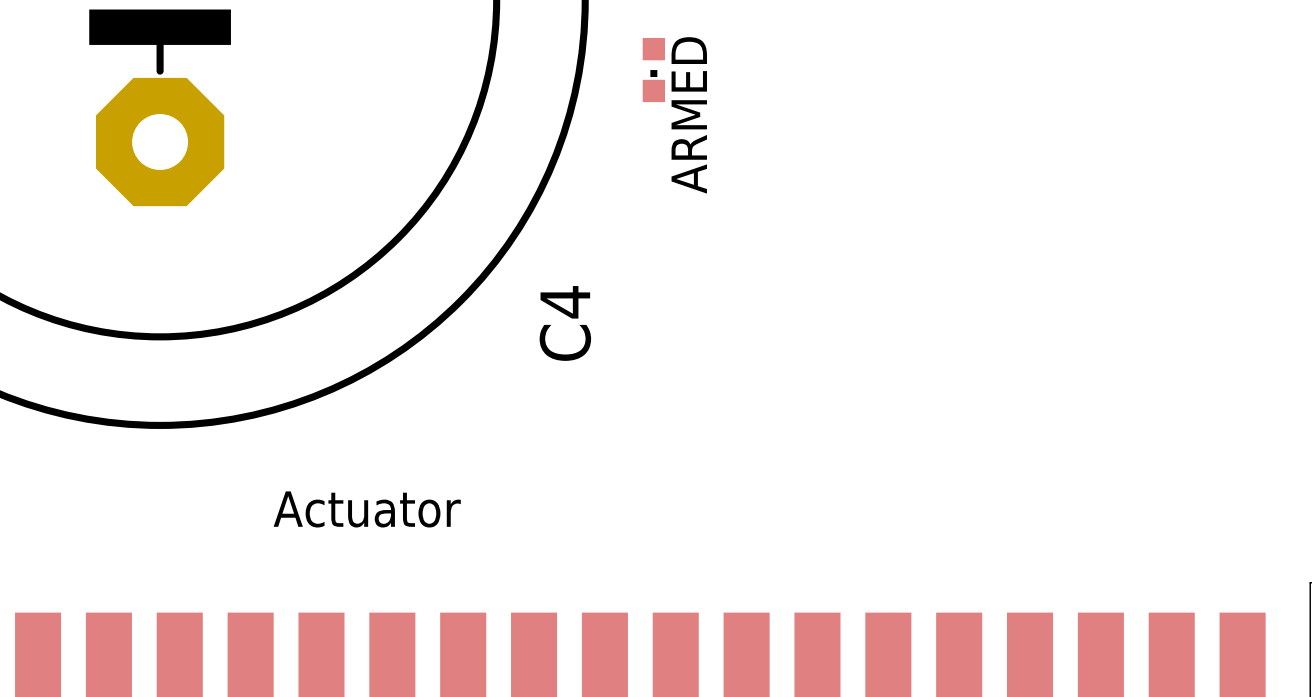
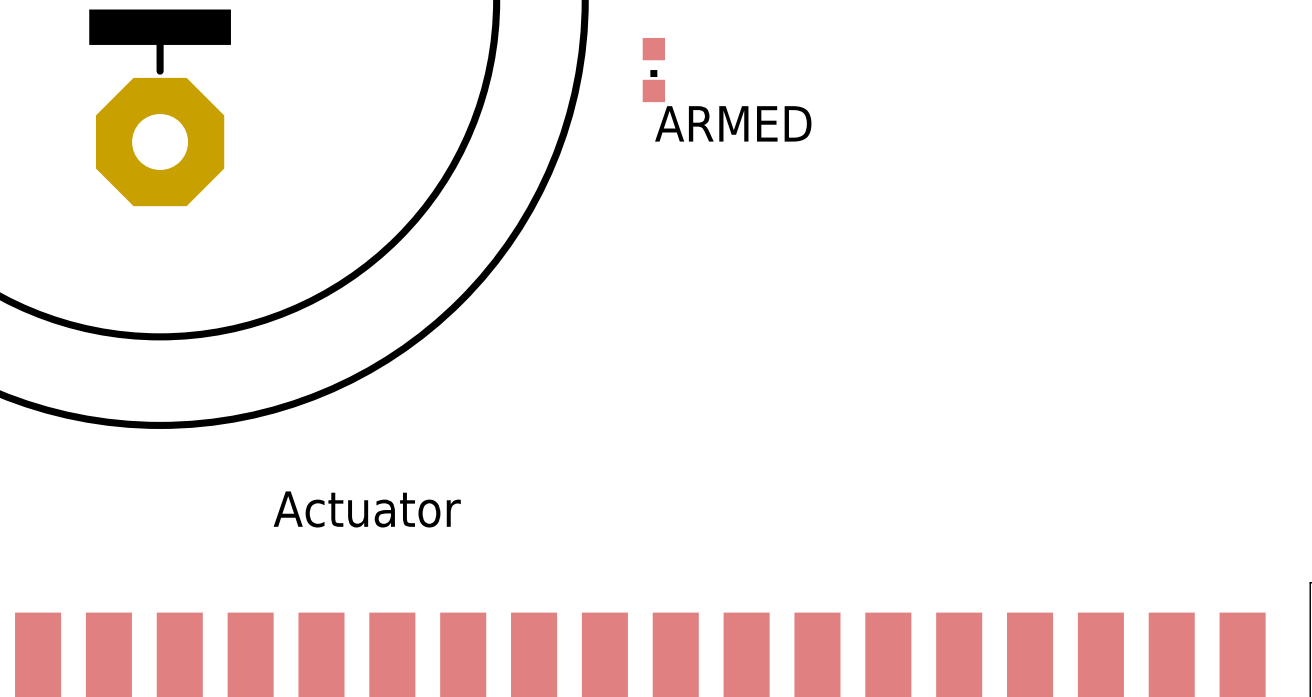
ARMED name rotation: 0° (689, 115) -> 90° clockwise (733, 123)
C4 name: C4 (565, 323) -> none

